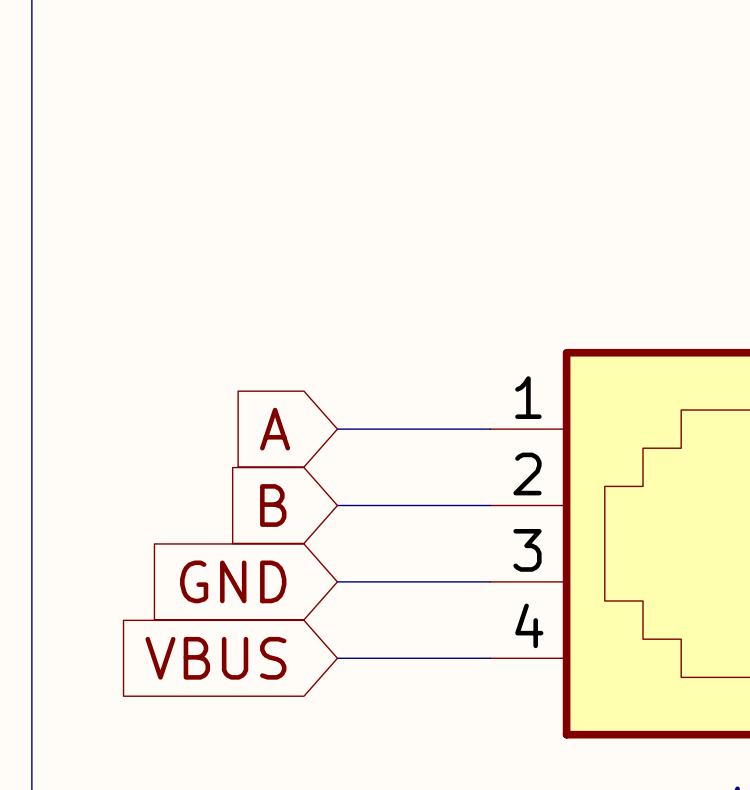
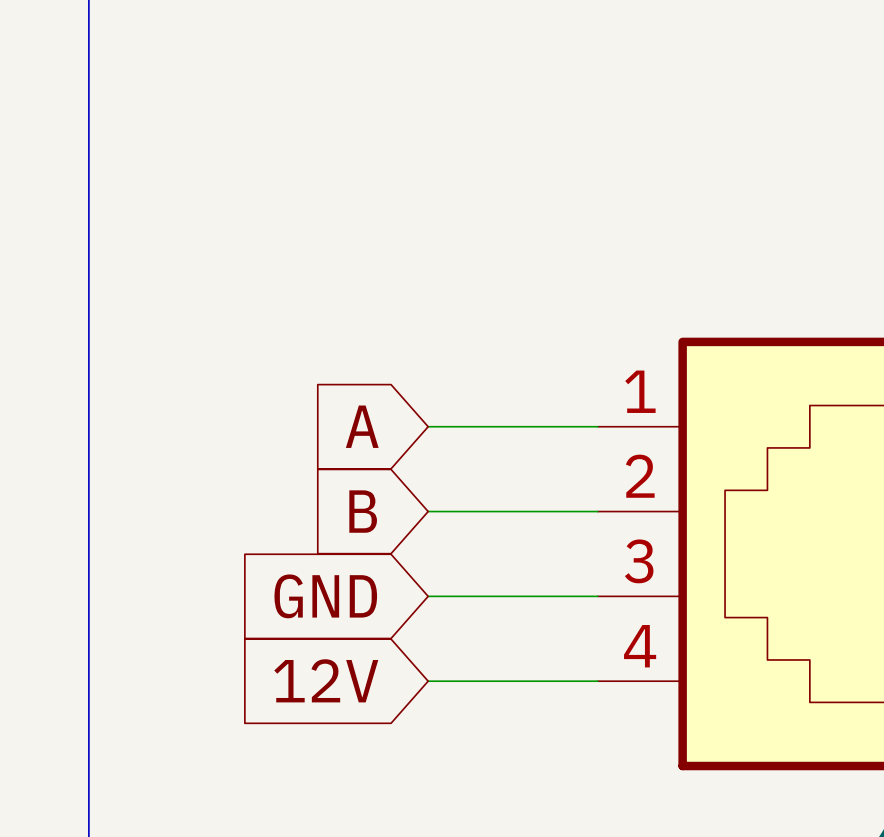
global label: VBUS (215, 658) -> 12V (326, 680)

